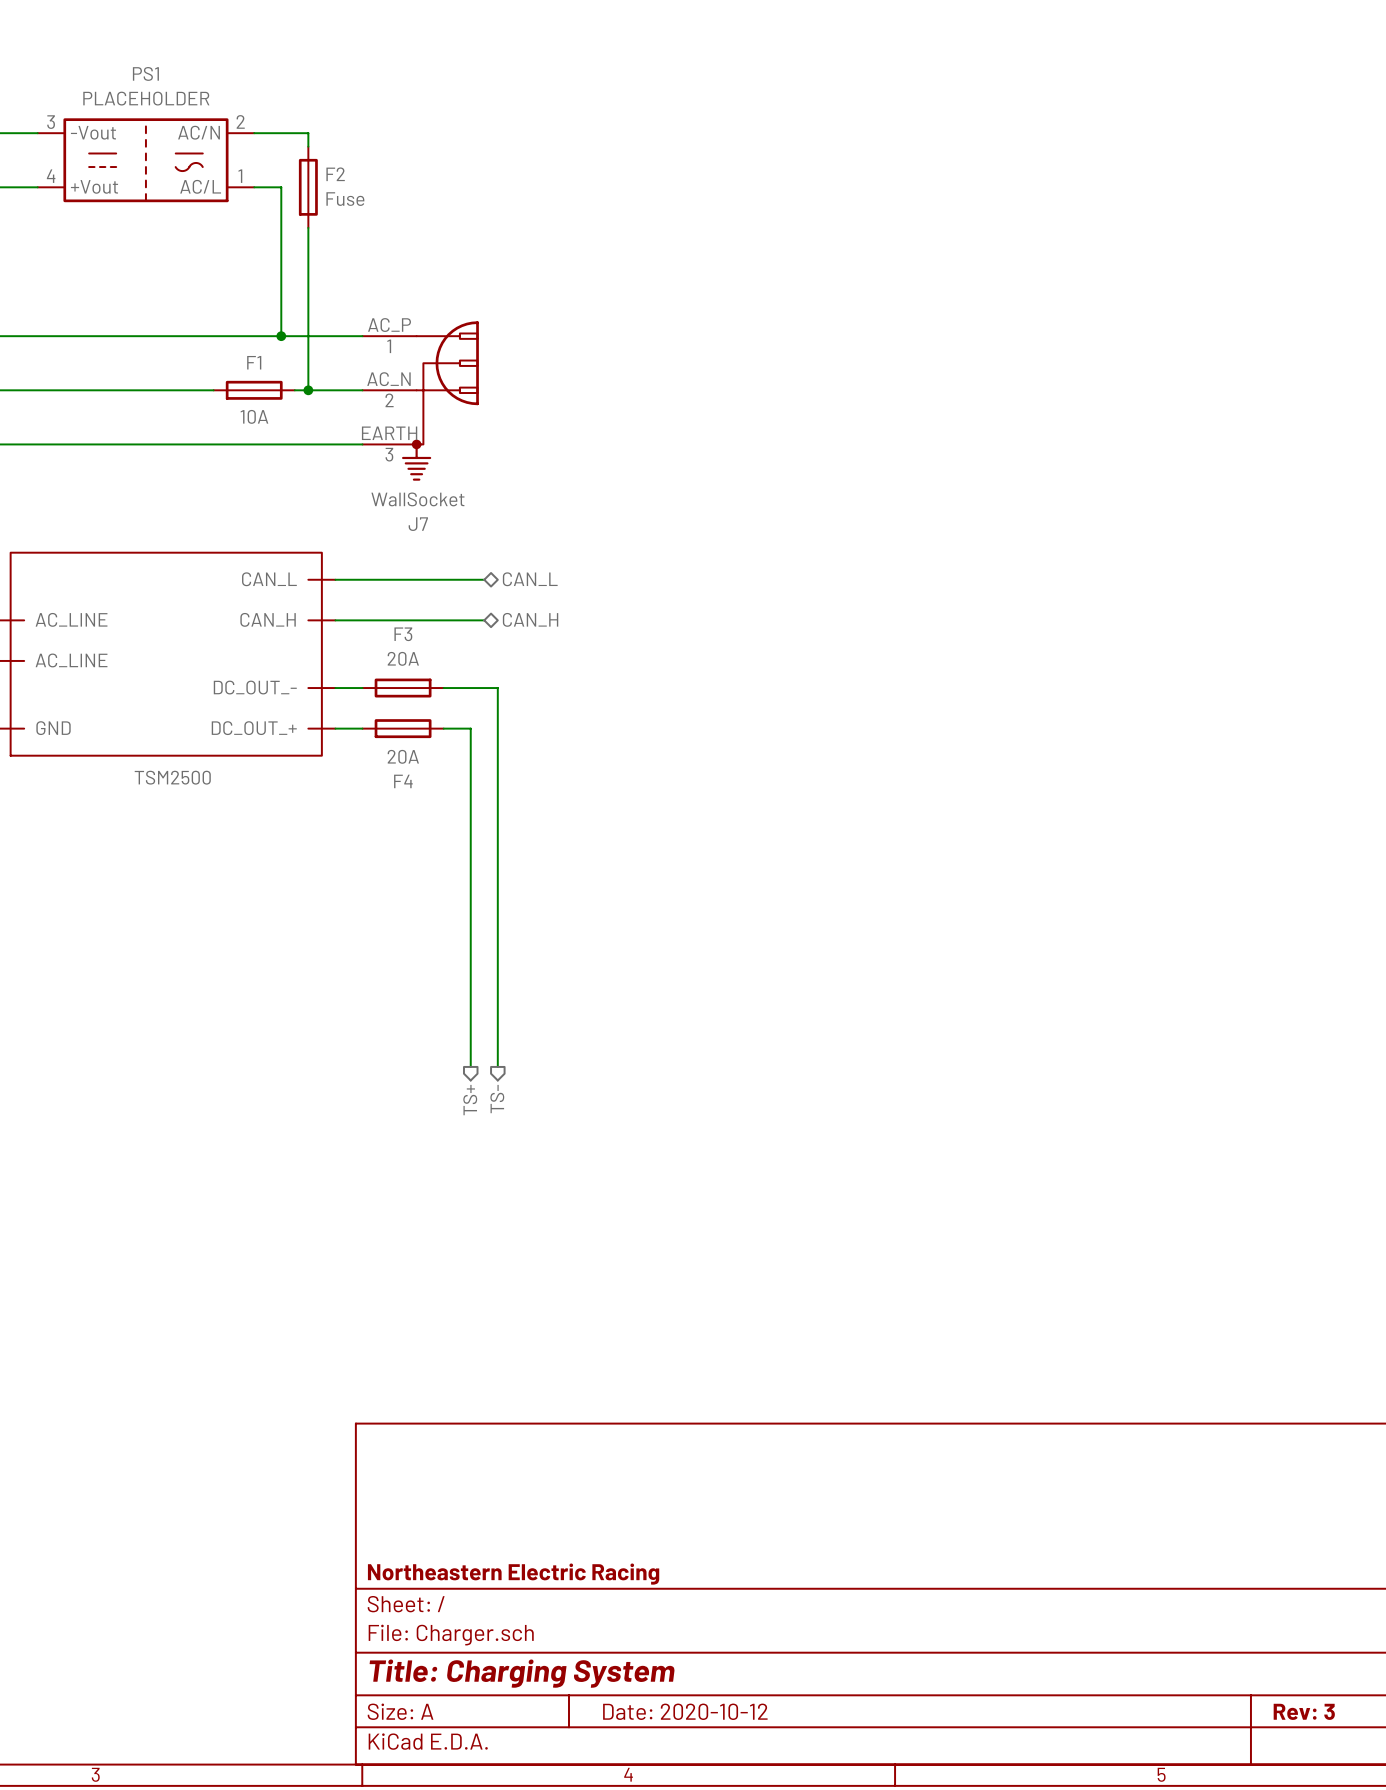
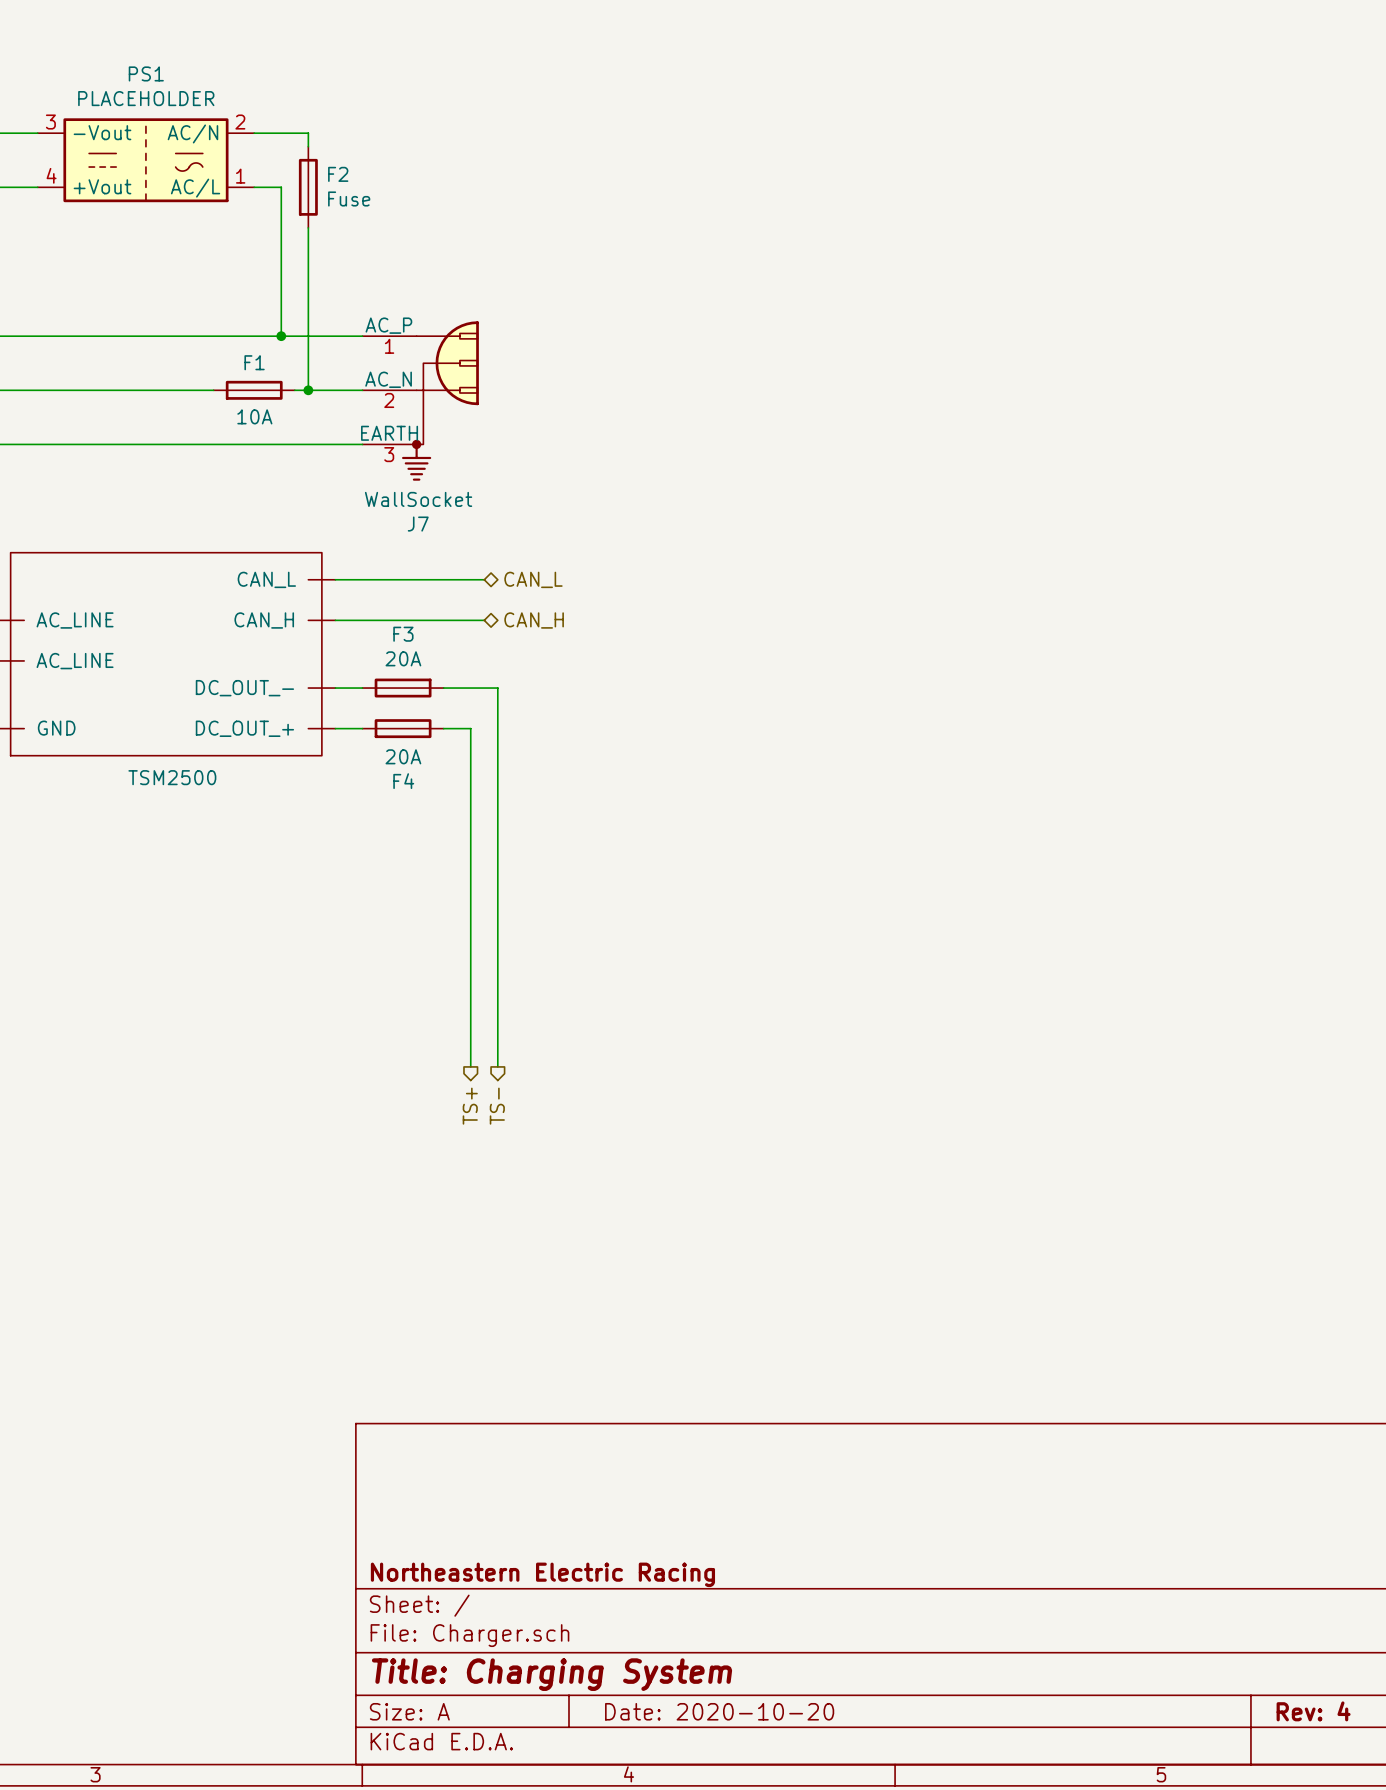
title block: Date: 2020-10-12 (685, 1711) -> Date: 2020-10-20 (719, 1711)
title block: Rev: 3 (1304, 1711) -> Rev: 4 (1313, 1711)

